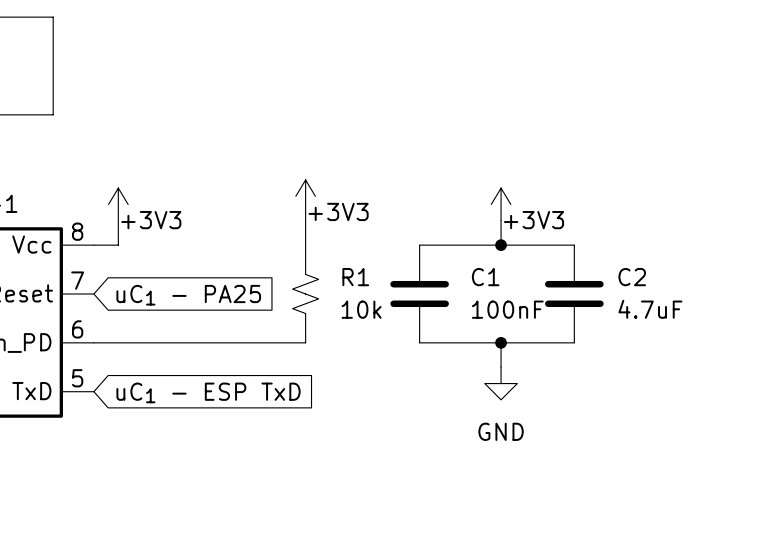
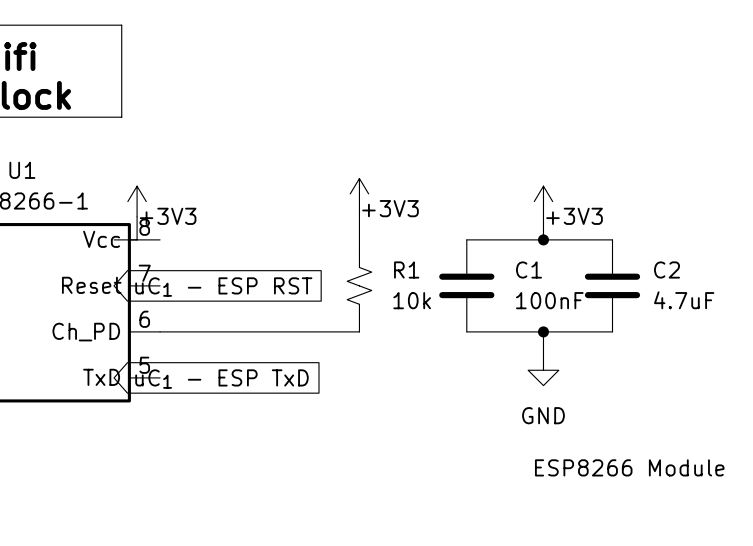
power symbol position: +3V3 (118, 204) -> +3V3 (137, 201)
wire: (118, 220) (118, 245) (93, 245) -> (137, 216) (137, 239) (114, 239)
global label: uC1 - PA25 (188, 295) -> uC1 - ESP RST (223, 287)
global label position: uC1 - ESP TxD (208, 392) -> uC1 - ESP TxD (221, 379)
text: none -> ESP8266 Module (629, 467)

